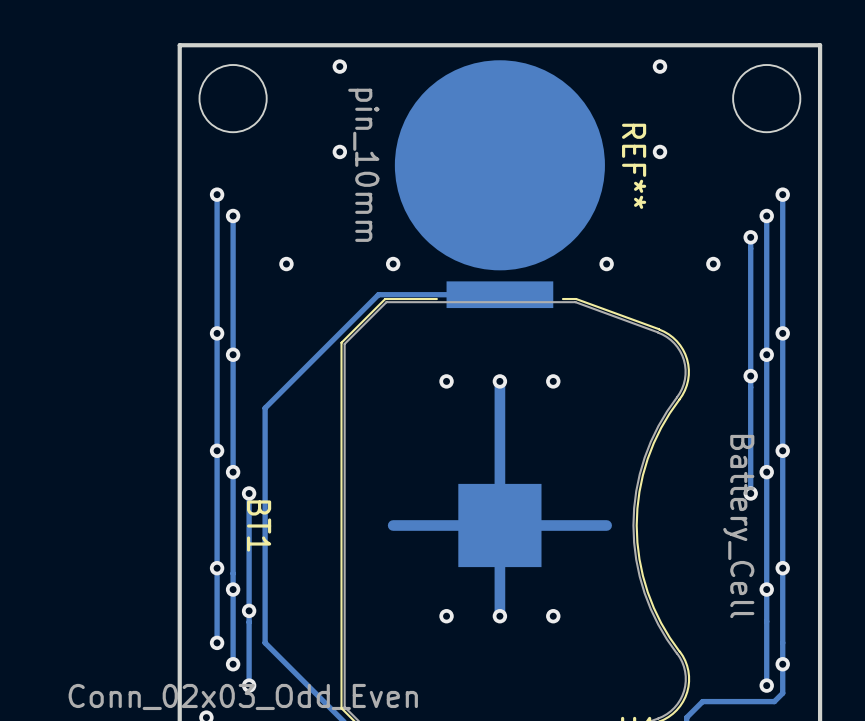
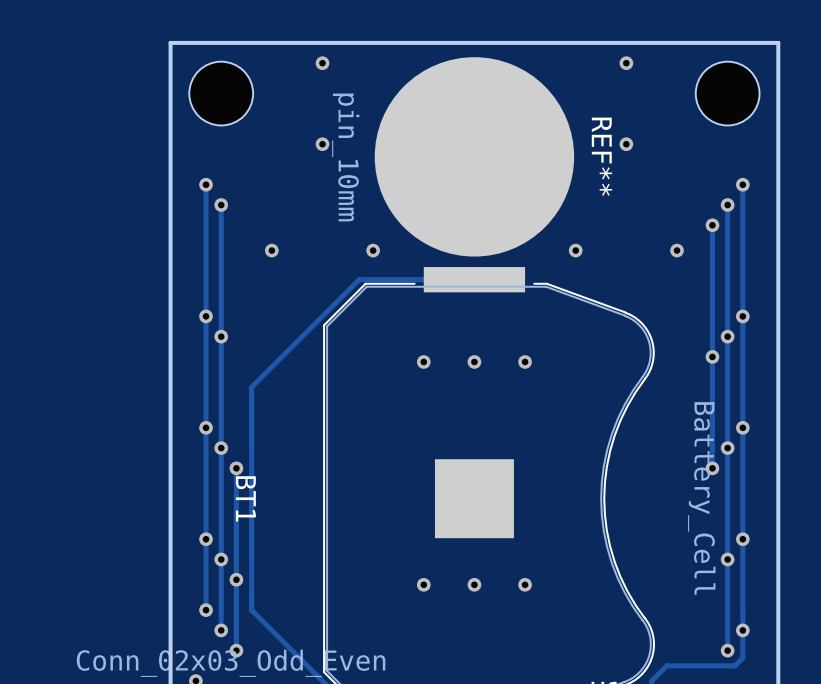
track: (499, 381) (499, 616) -> none
track: (606, 525) (393, 525) -> none

